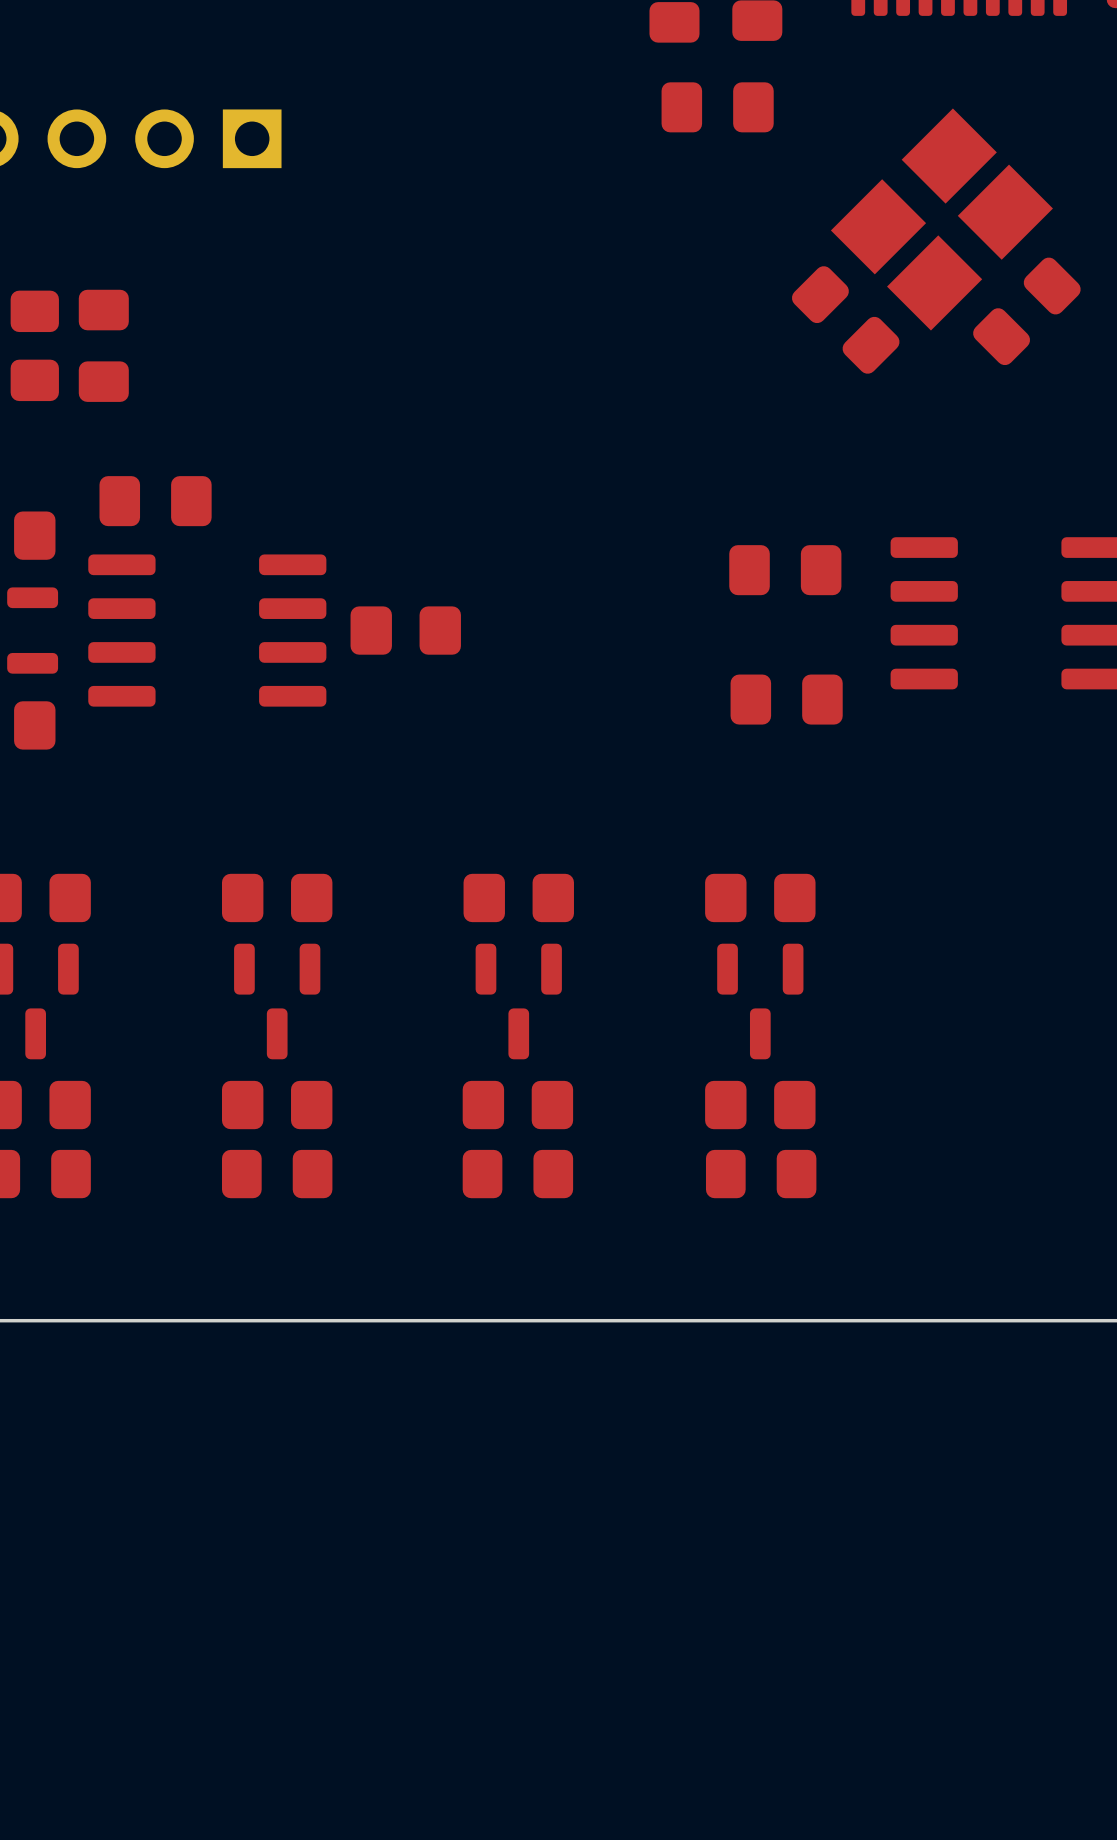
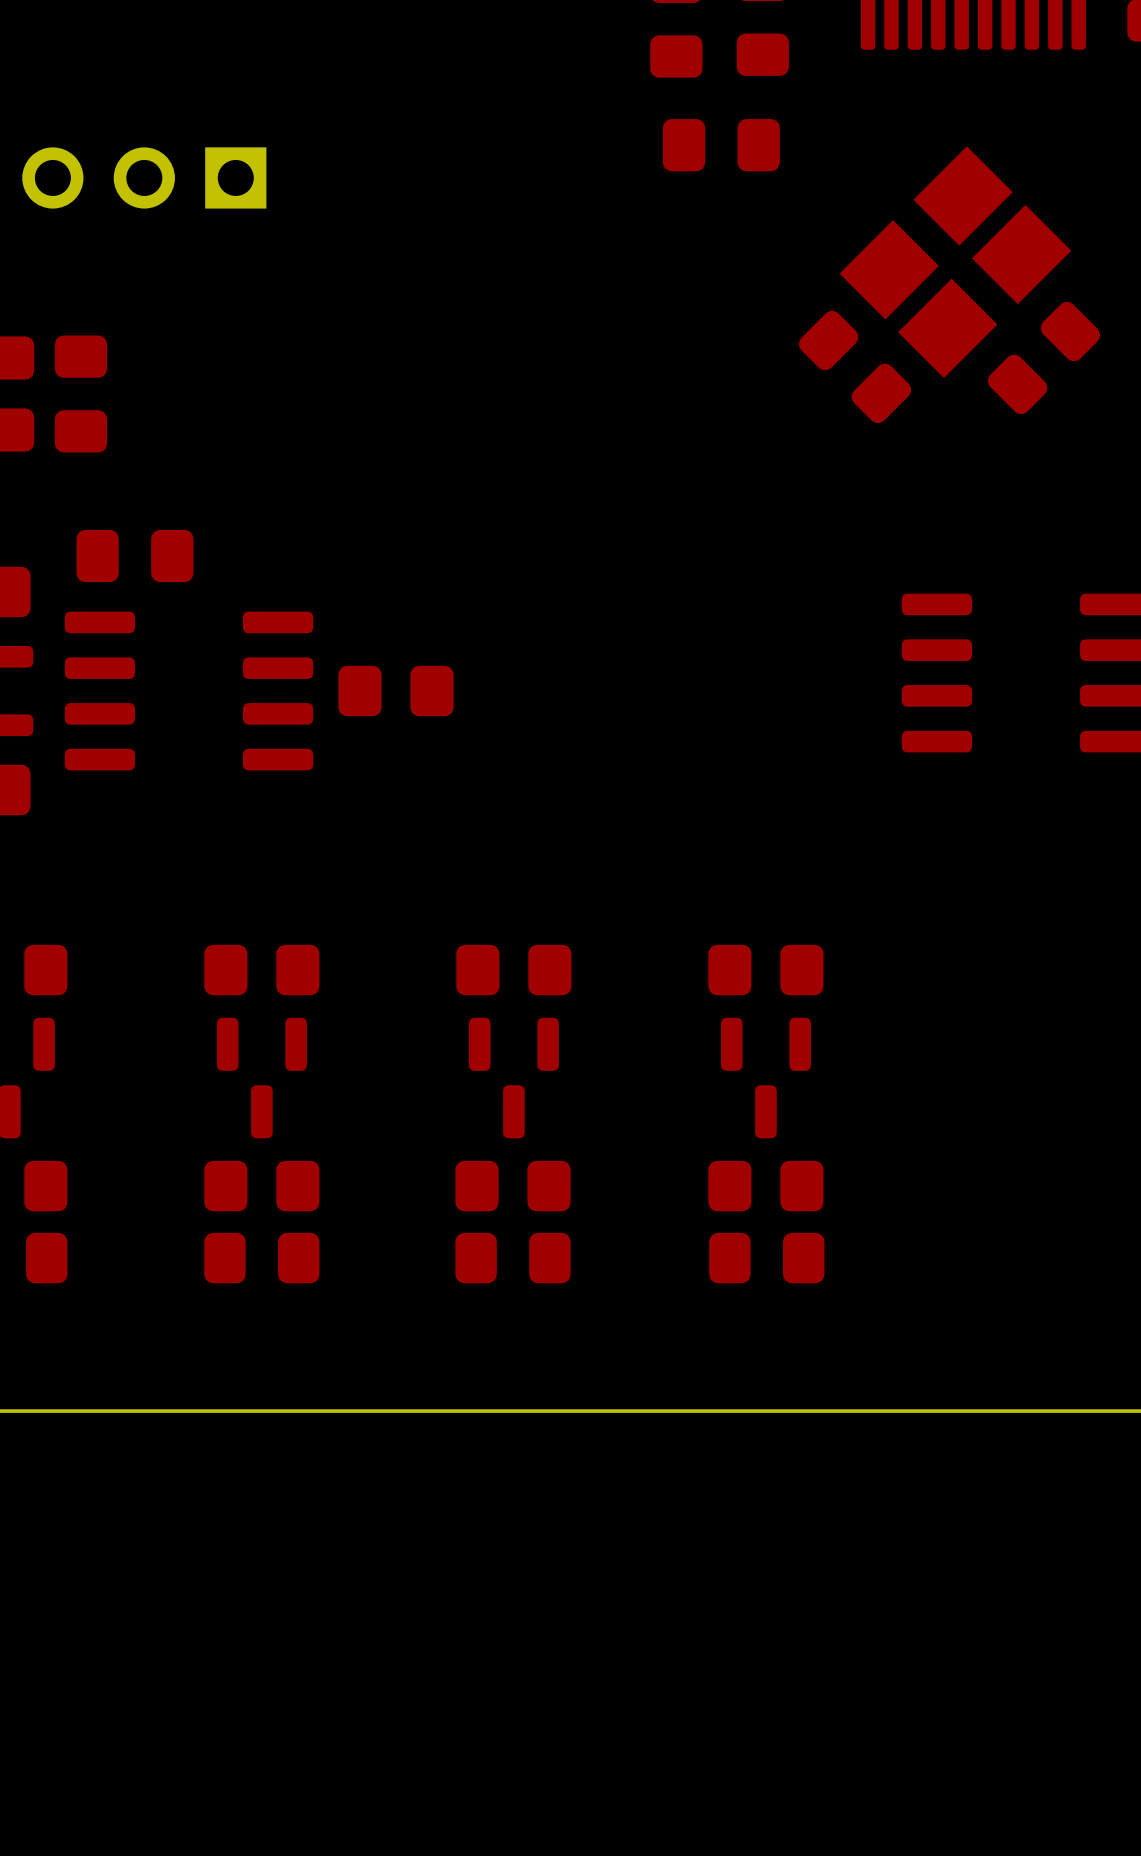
part: (785, 570) -> none
part: (786, 699) -> none

